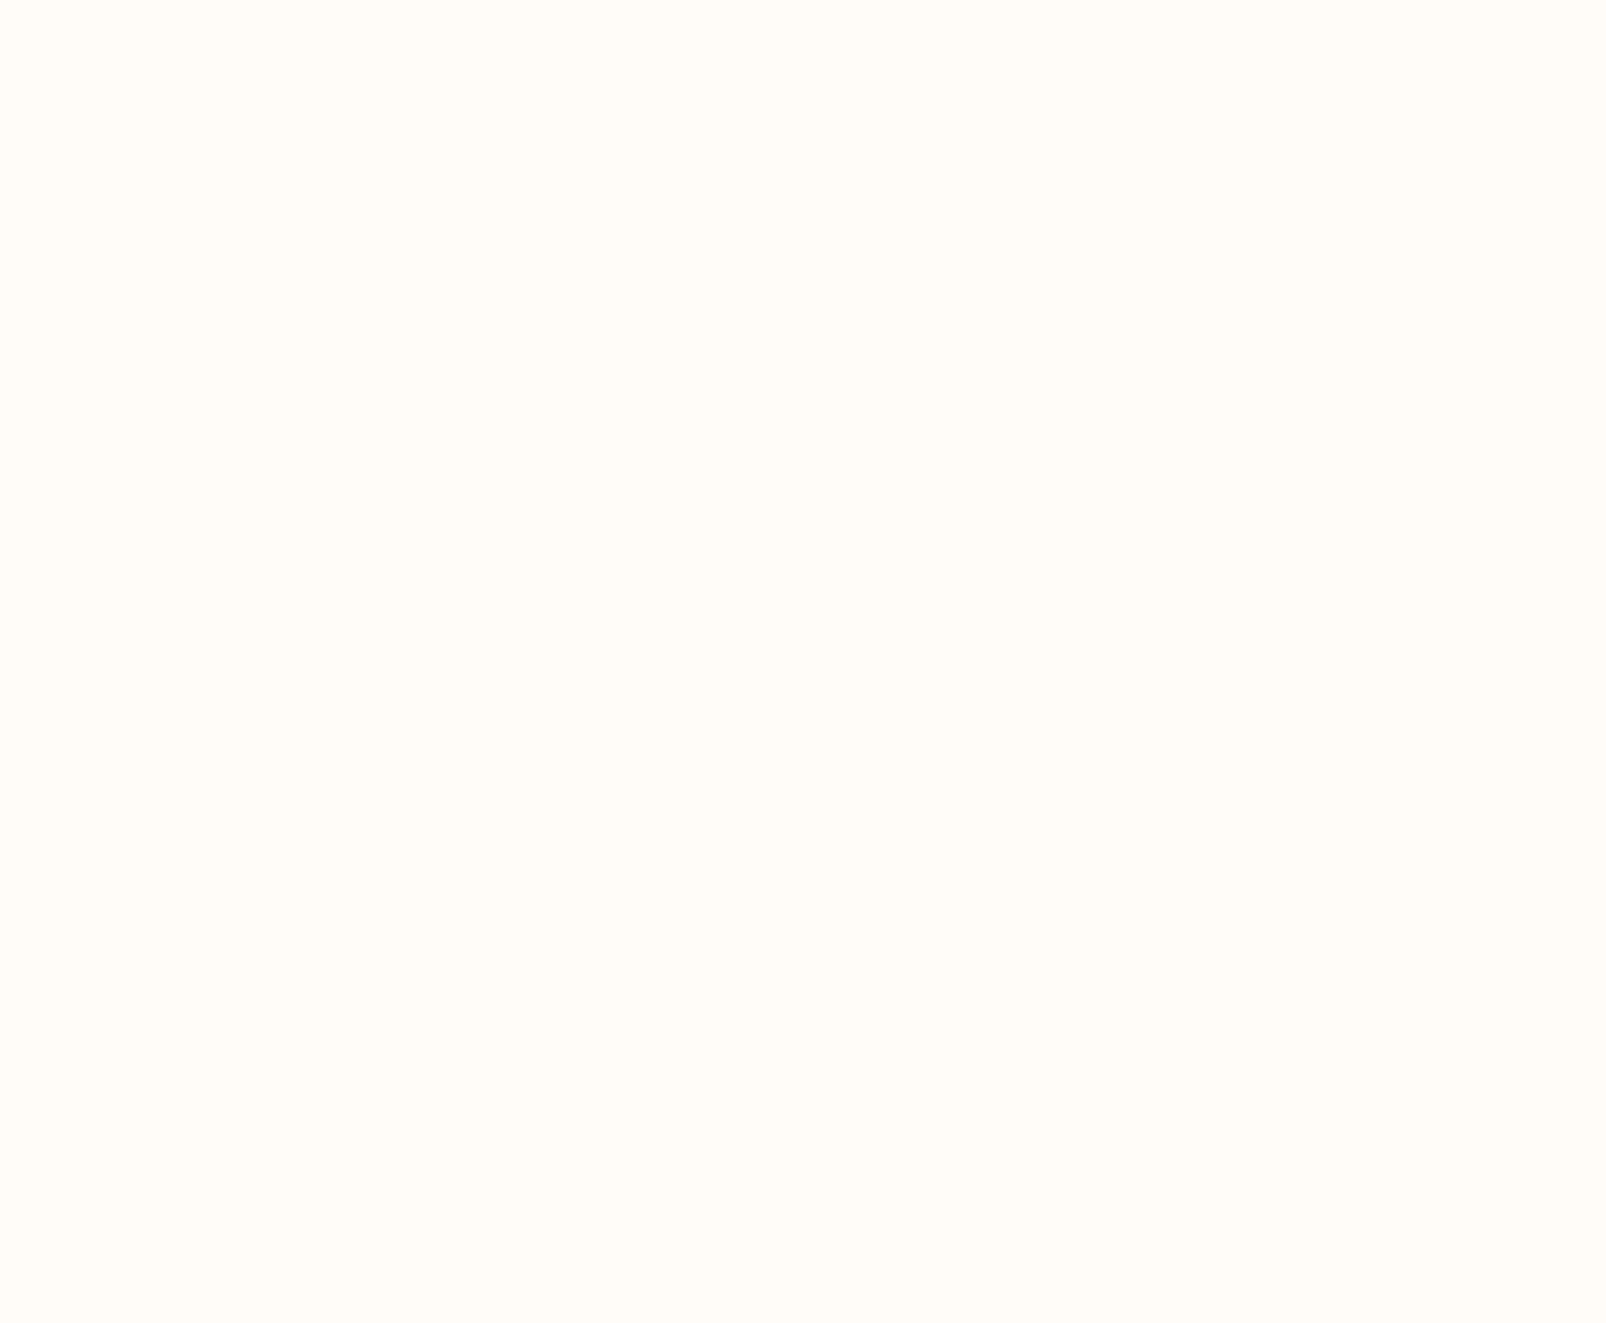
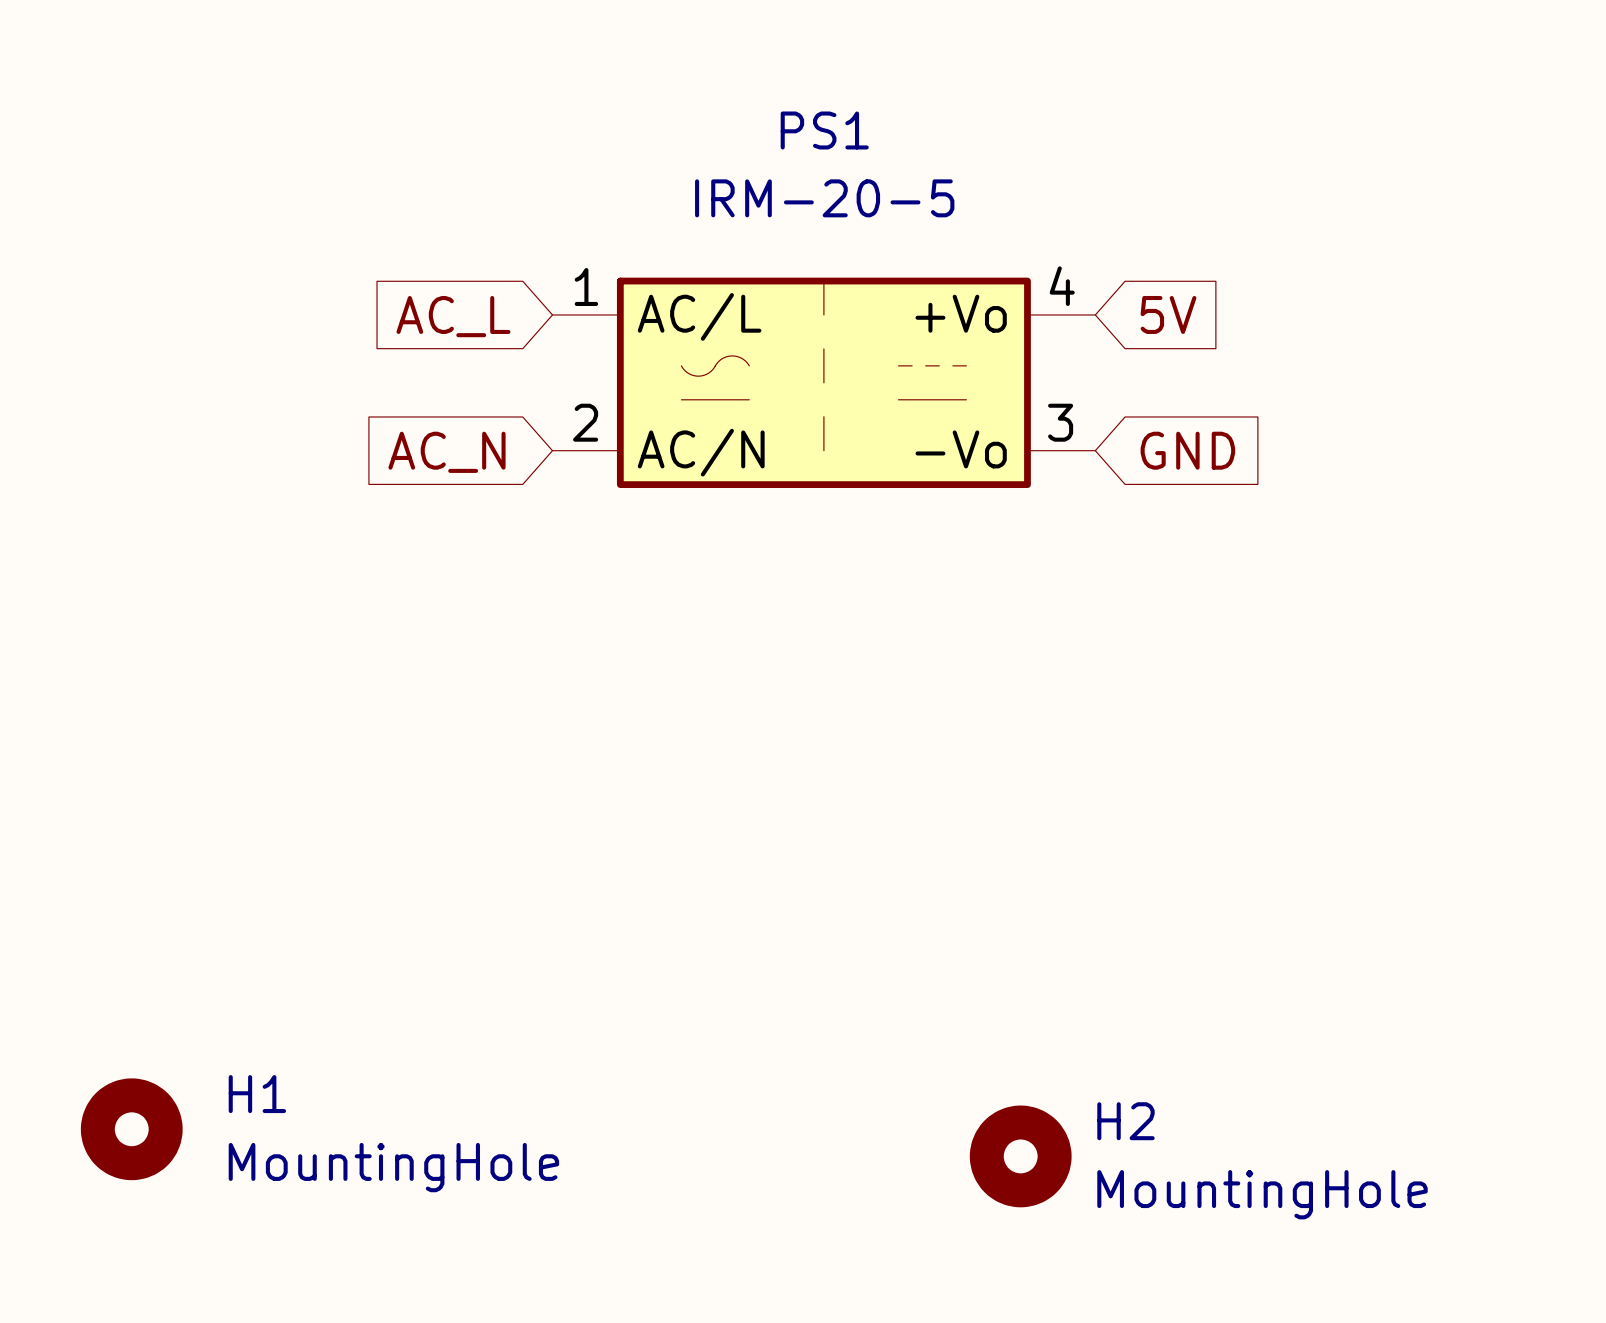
global label: none -> 5V (1168, 314)
global label: none -> AC_L (453, 316)
PS1: none -> IRM-20-5 (823, 382)
global label: none -> GND (1187, 450)
global label: none -> AC_N (447, 452)
H1: none -> MountingHole (131, 1129)
H2: none -> MountingHole (1020, 1156)

